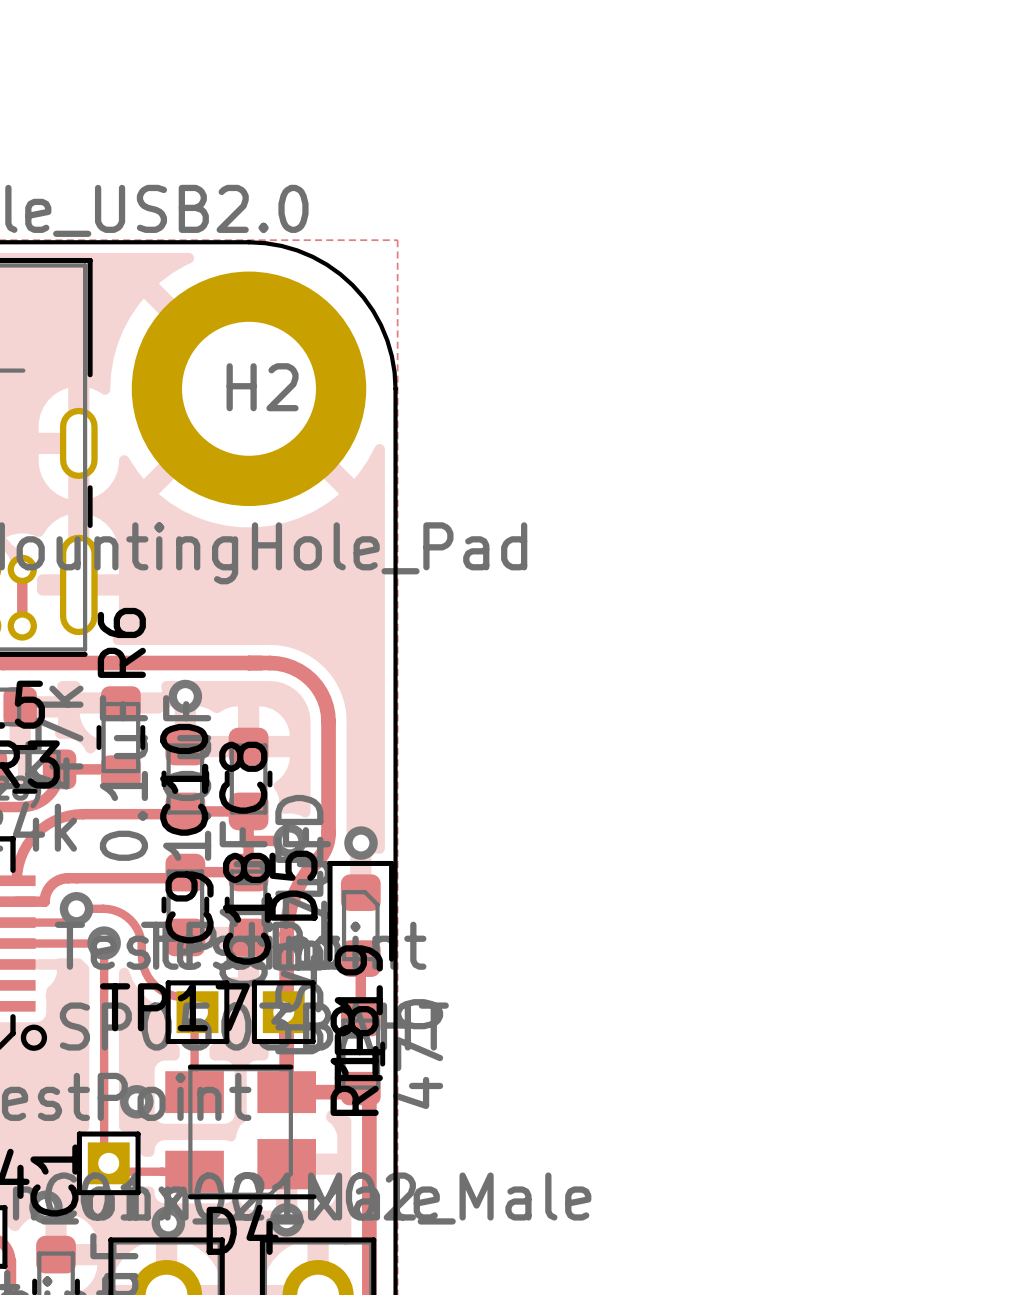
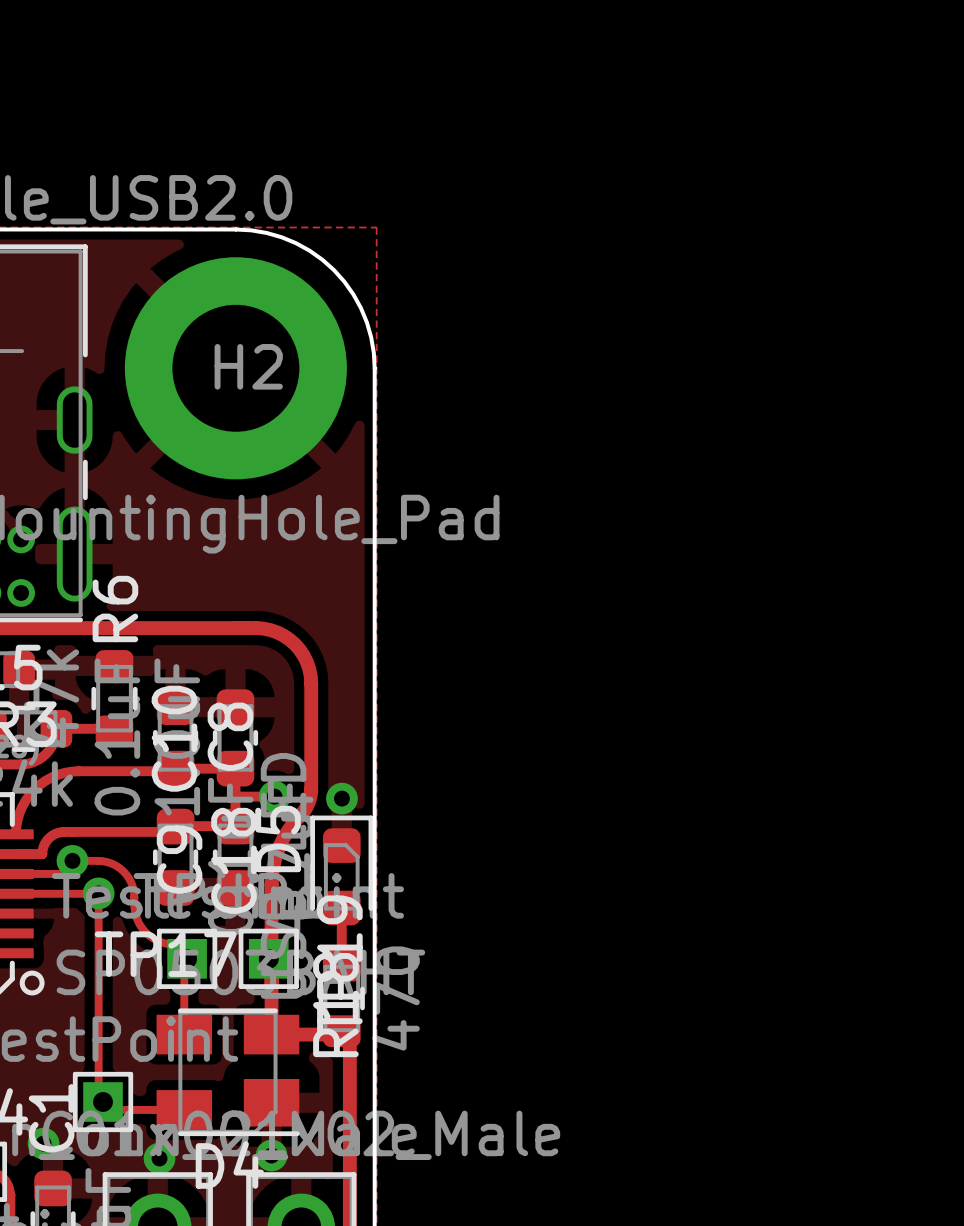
track: (22, 569) (22, 625) -> none
via: (185, 696) -> none
via: (136, 1101) -> none

